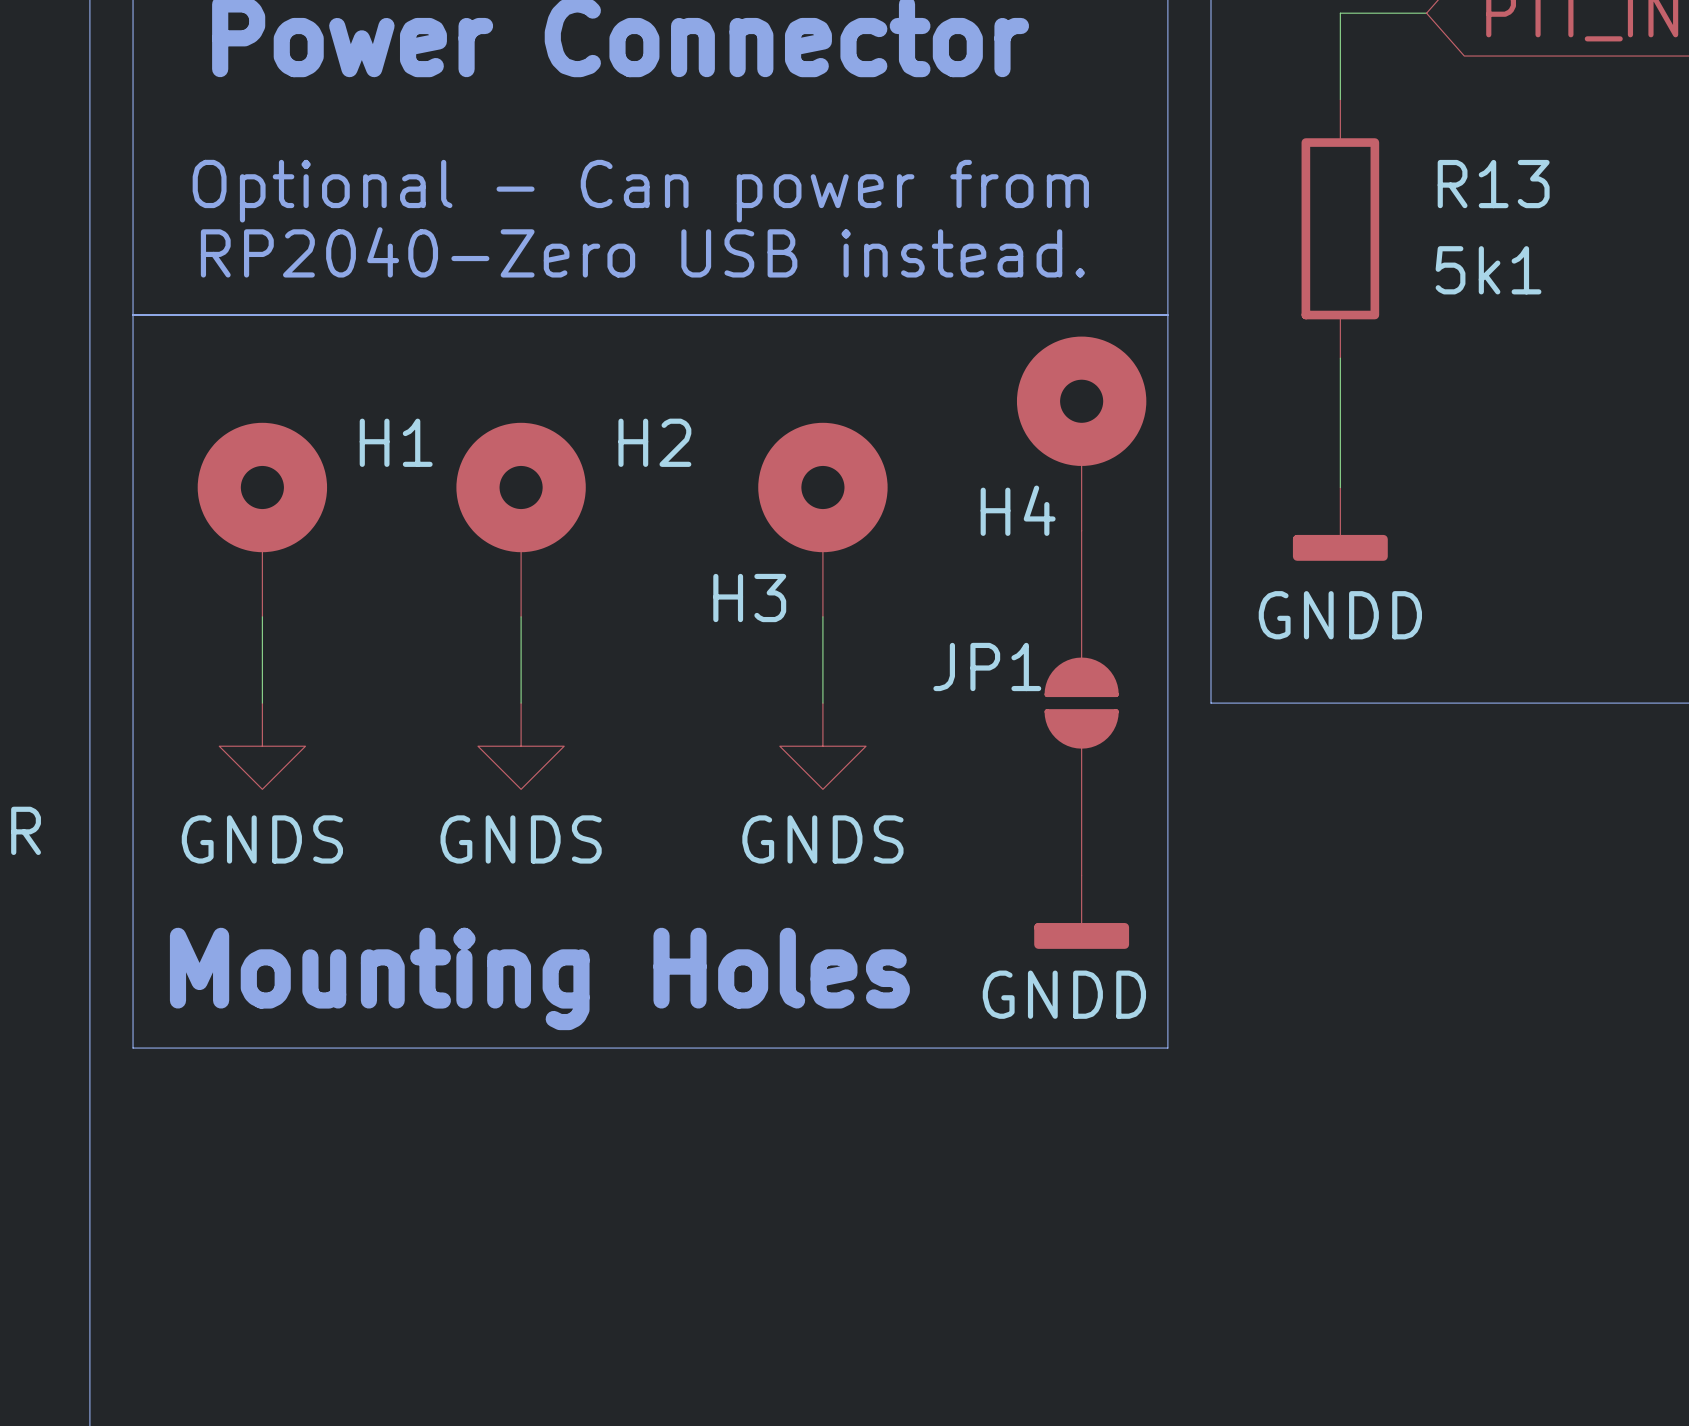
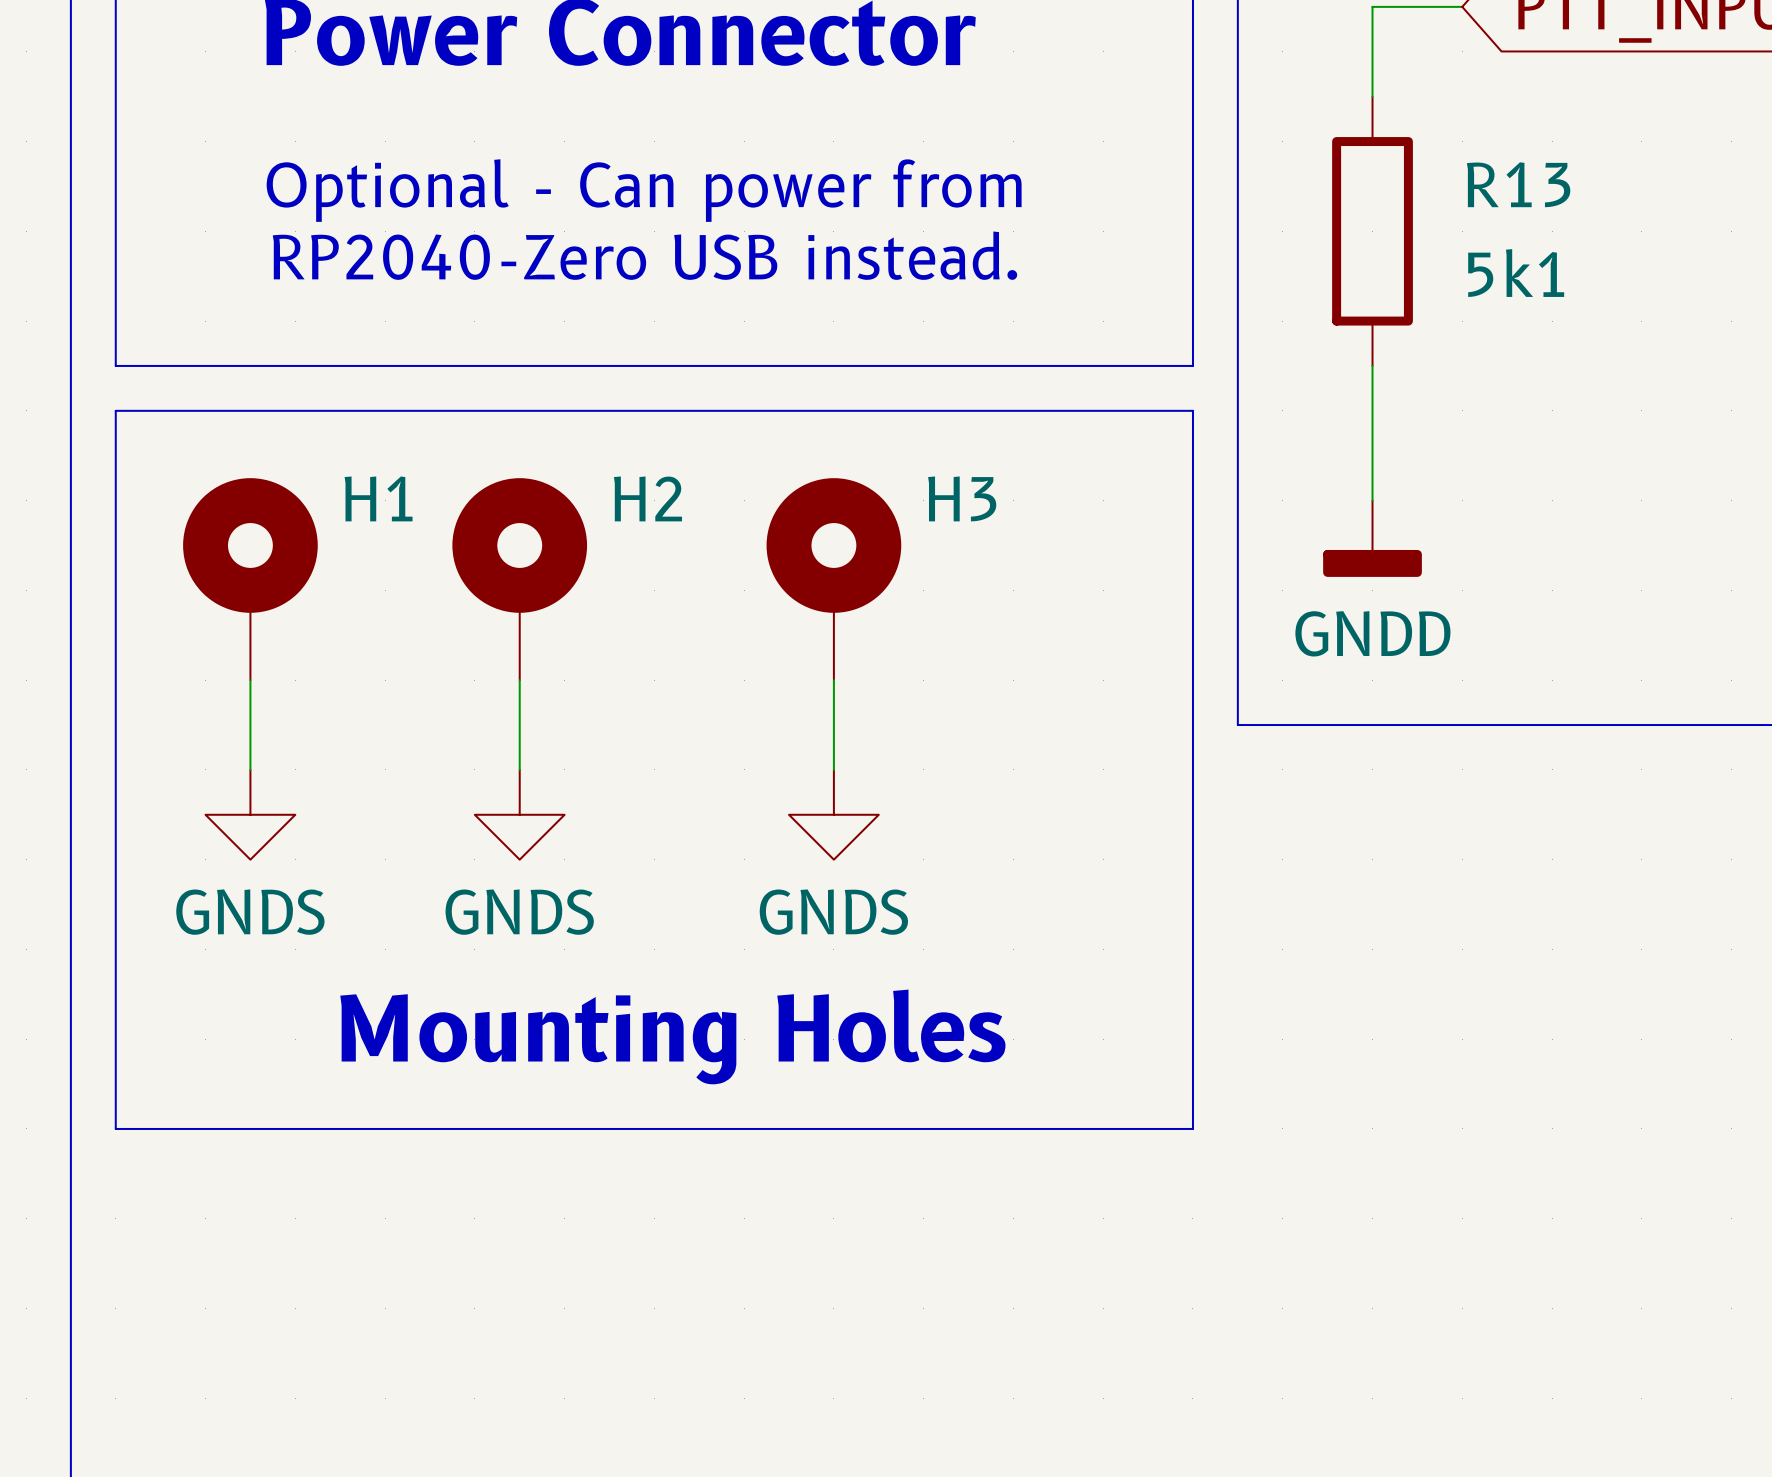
line: (133, 315) (1167, 315) -> none
line: (133, 358) (133, 401) -> (115, 365) (1192, 365)
line: (1167, 358) (1167, 401) -> (115, 410) (1192, 410)
H4: (1081, 433) -> none
H1 position: (262, 519) -> (250, 579)
H2 position: (521, 519) -> (519, 579)
H3 position: (822, 519) -> (833, 579)
H3 name position: H3 (749, 598) -> H3 (962, 498)
JP1: (1081, 703) -> none
power symbol position: GNDS (262, 746) -> GNDS (250, 814)
power symbol position: GNDS (521, 746) -> GNDS (519, 814)
power symbol position: GNDS (822, 746) -> GNDS (833, 814)
power symbol: GNDD (1081, 912) -> none
text position: Mounting Holes (539, 978) -> Mounting Holes (672, 1036)
line: (133, 1048) (1167, 1048) -> (115, 1084) (115, 1128) (1192, 1128) (1192, 1084)

